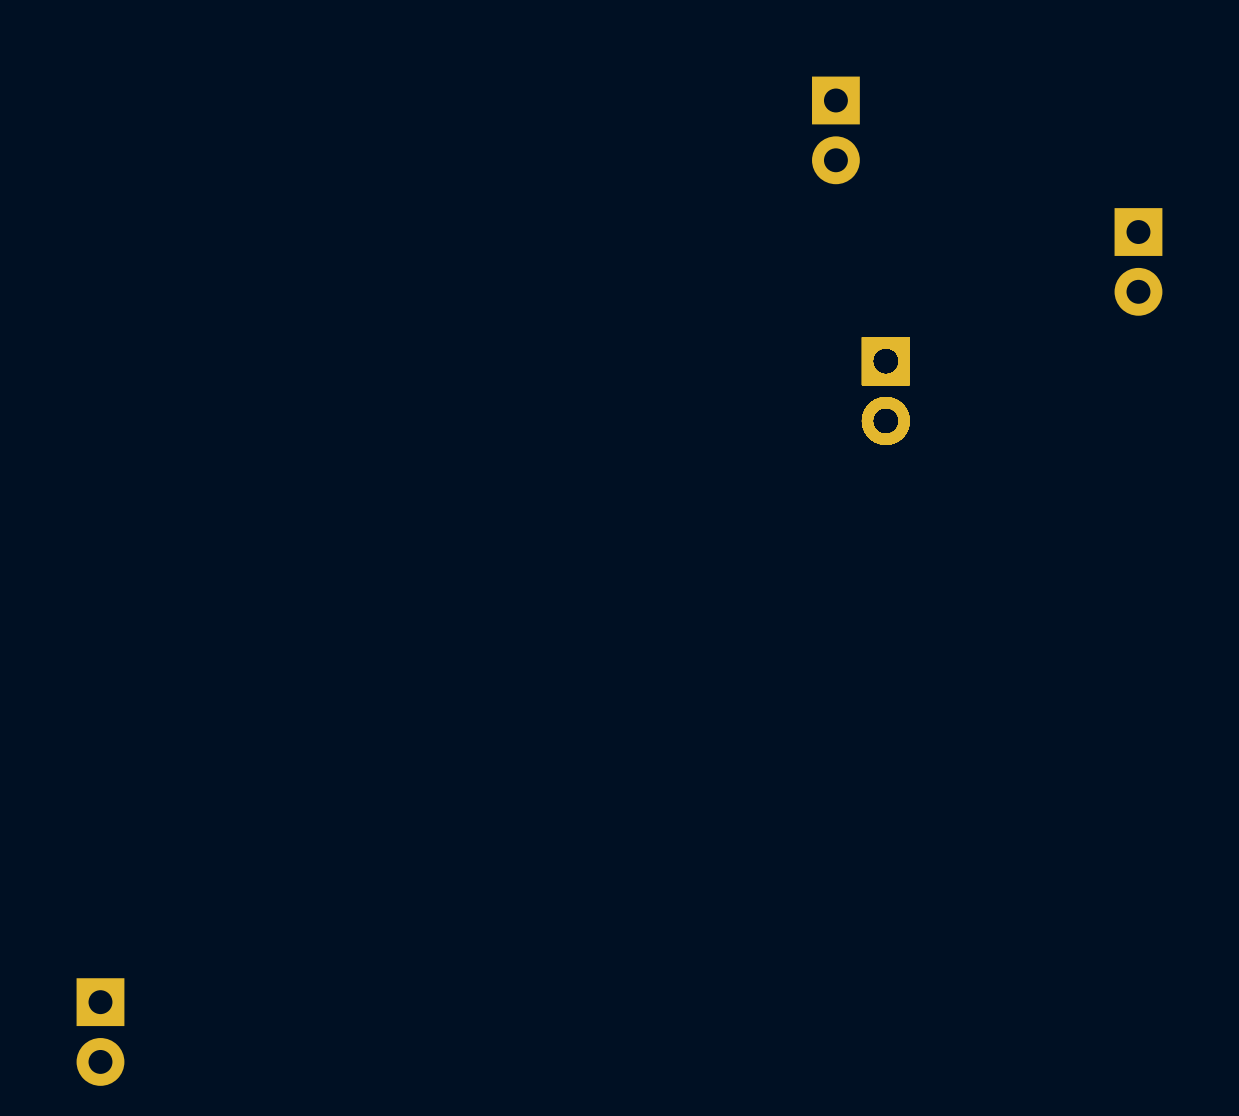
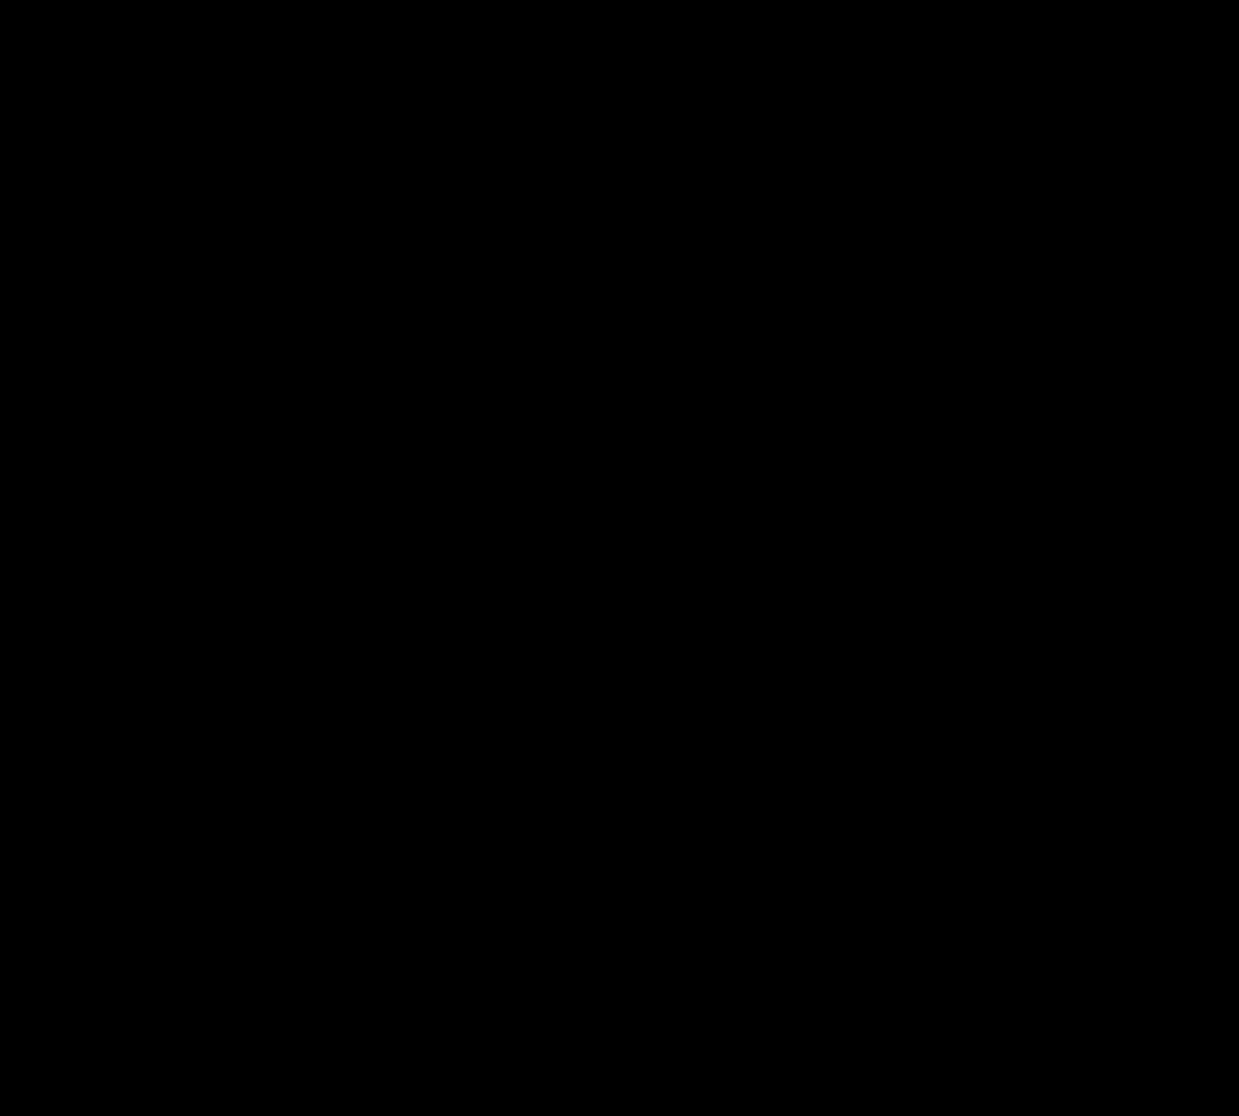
part: (835, 130) -> none
part: (1138, 261) -> none
part: (885, 391) -> none
part: (100, 1032) -> none

